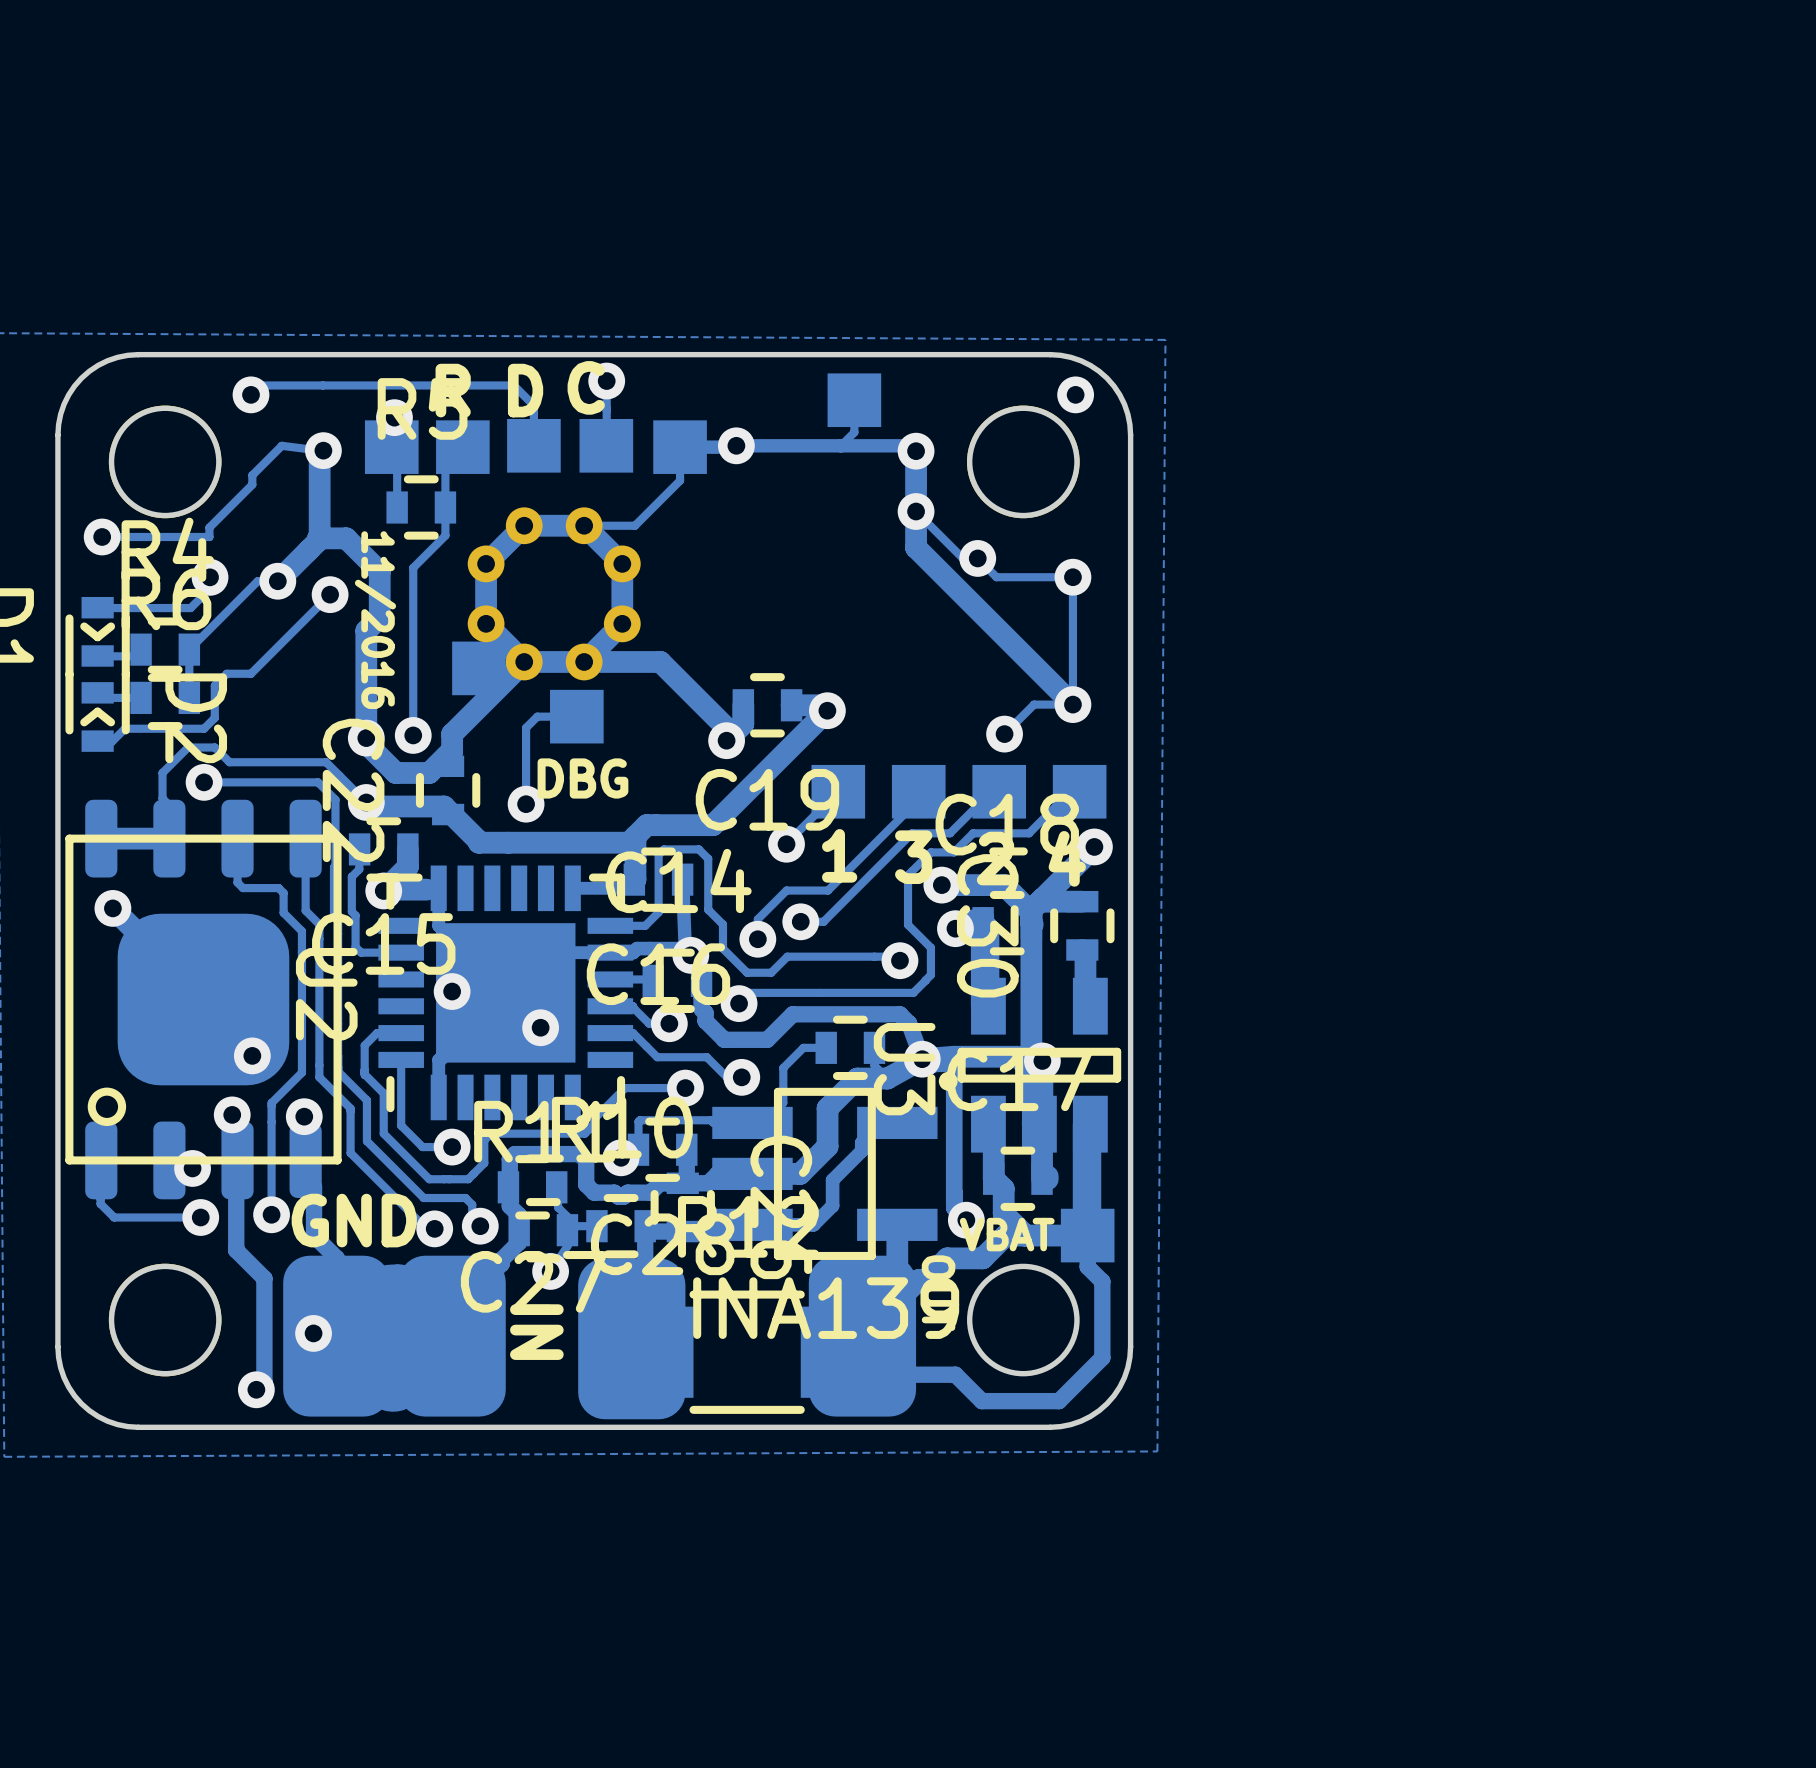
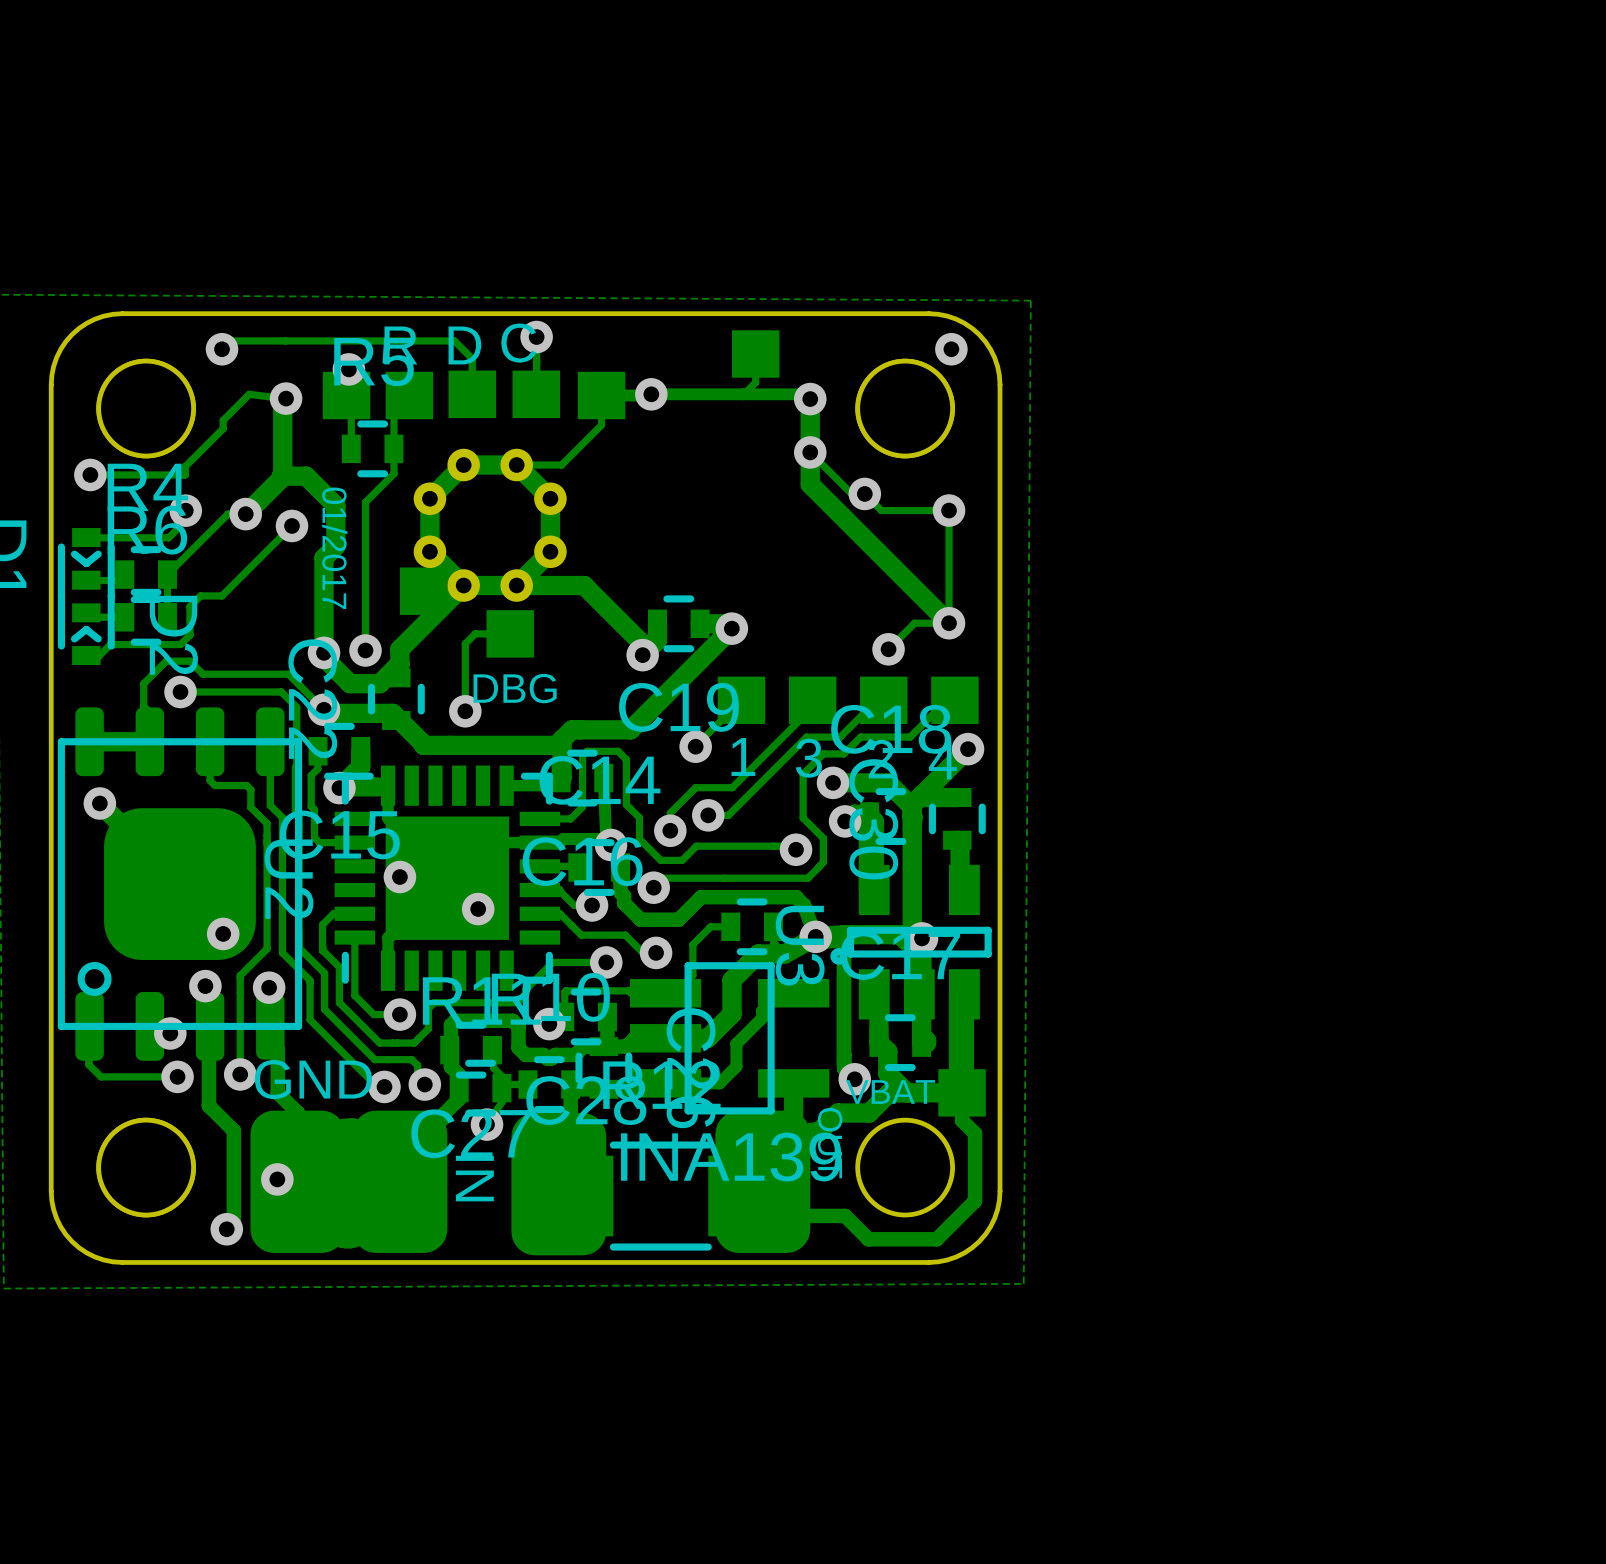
text: 11/2016 (375, 620) -> 01/2017 (334, 548)

